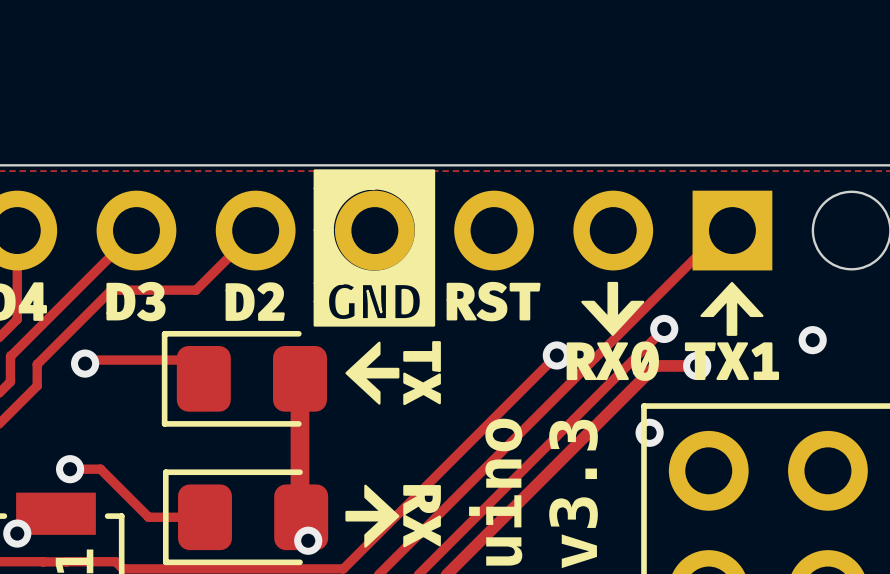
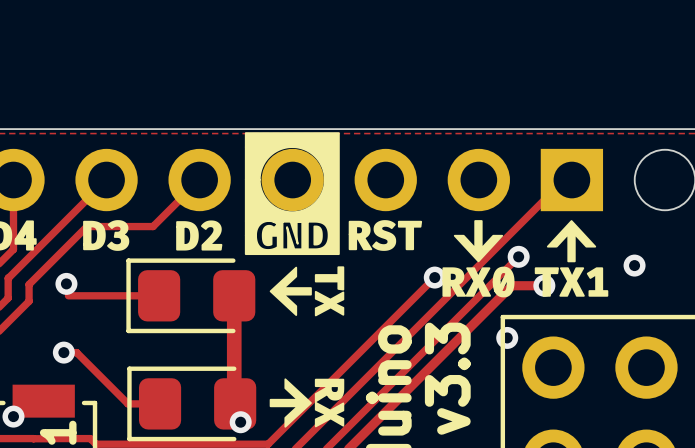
track: (85, 363) (88, 360) (185, 360) (203, 378) -> (68, 295) (159, 295)
track: (70, 469) (100, 469) (148, 517) (163, 517) -> (63, 352) (76, 352) (127, 403)
via position: (70, 469) -> (63, 352)

